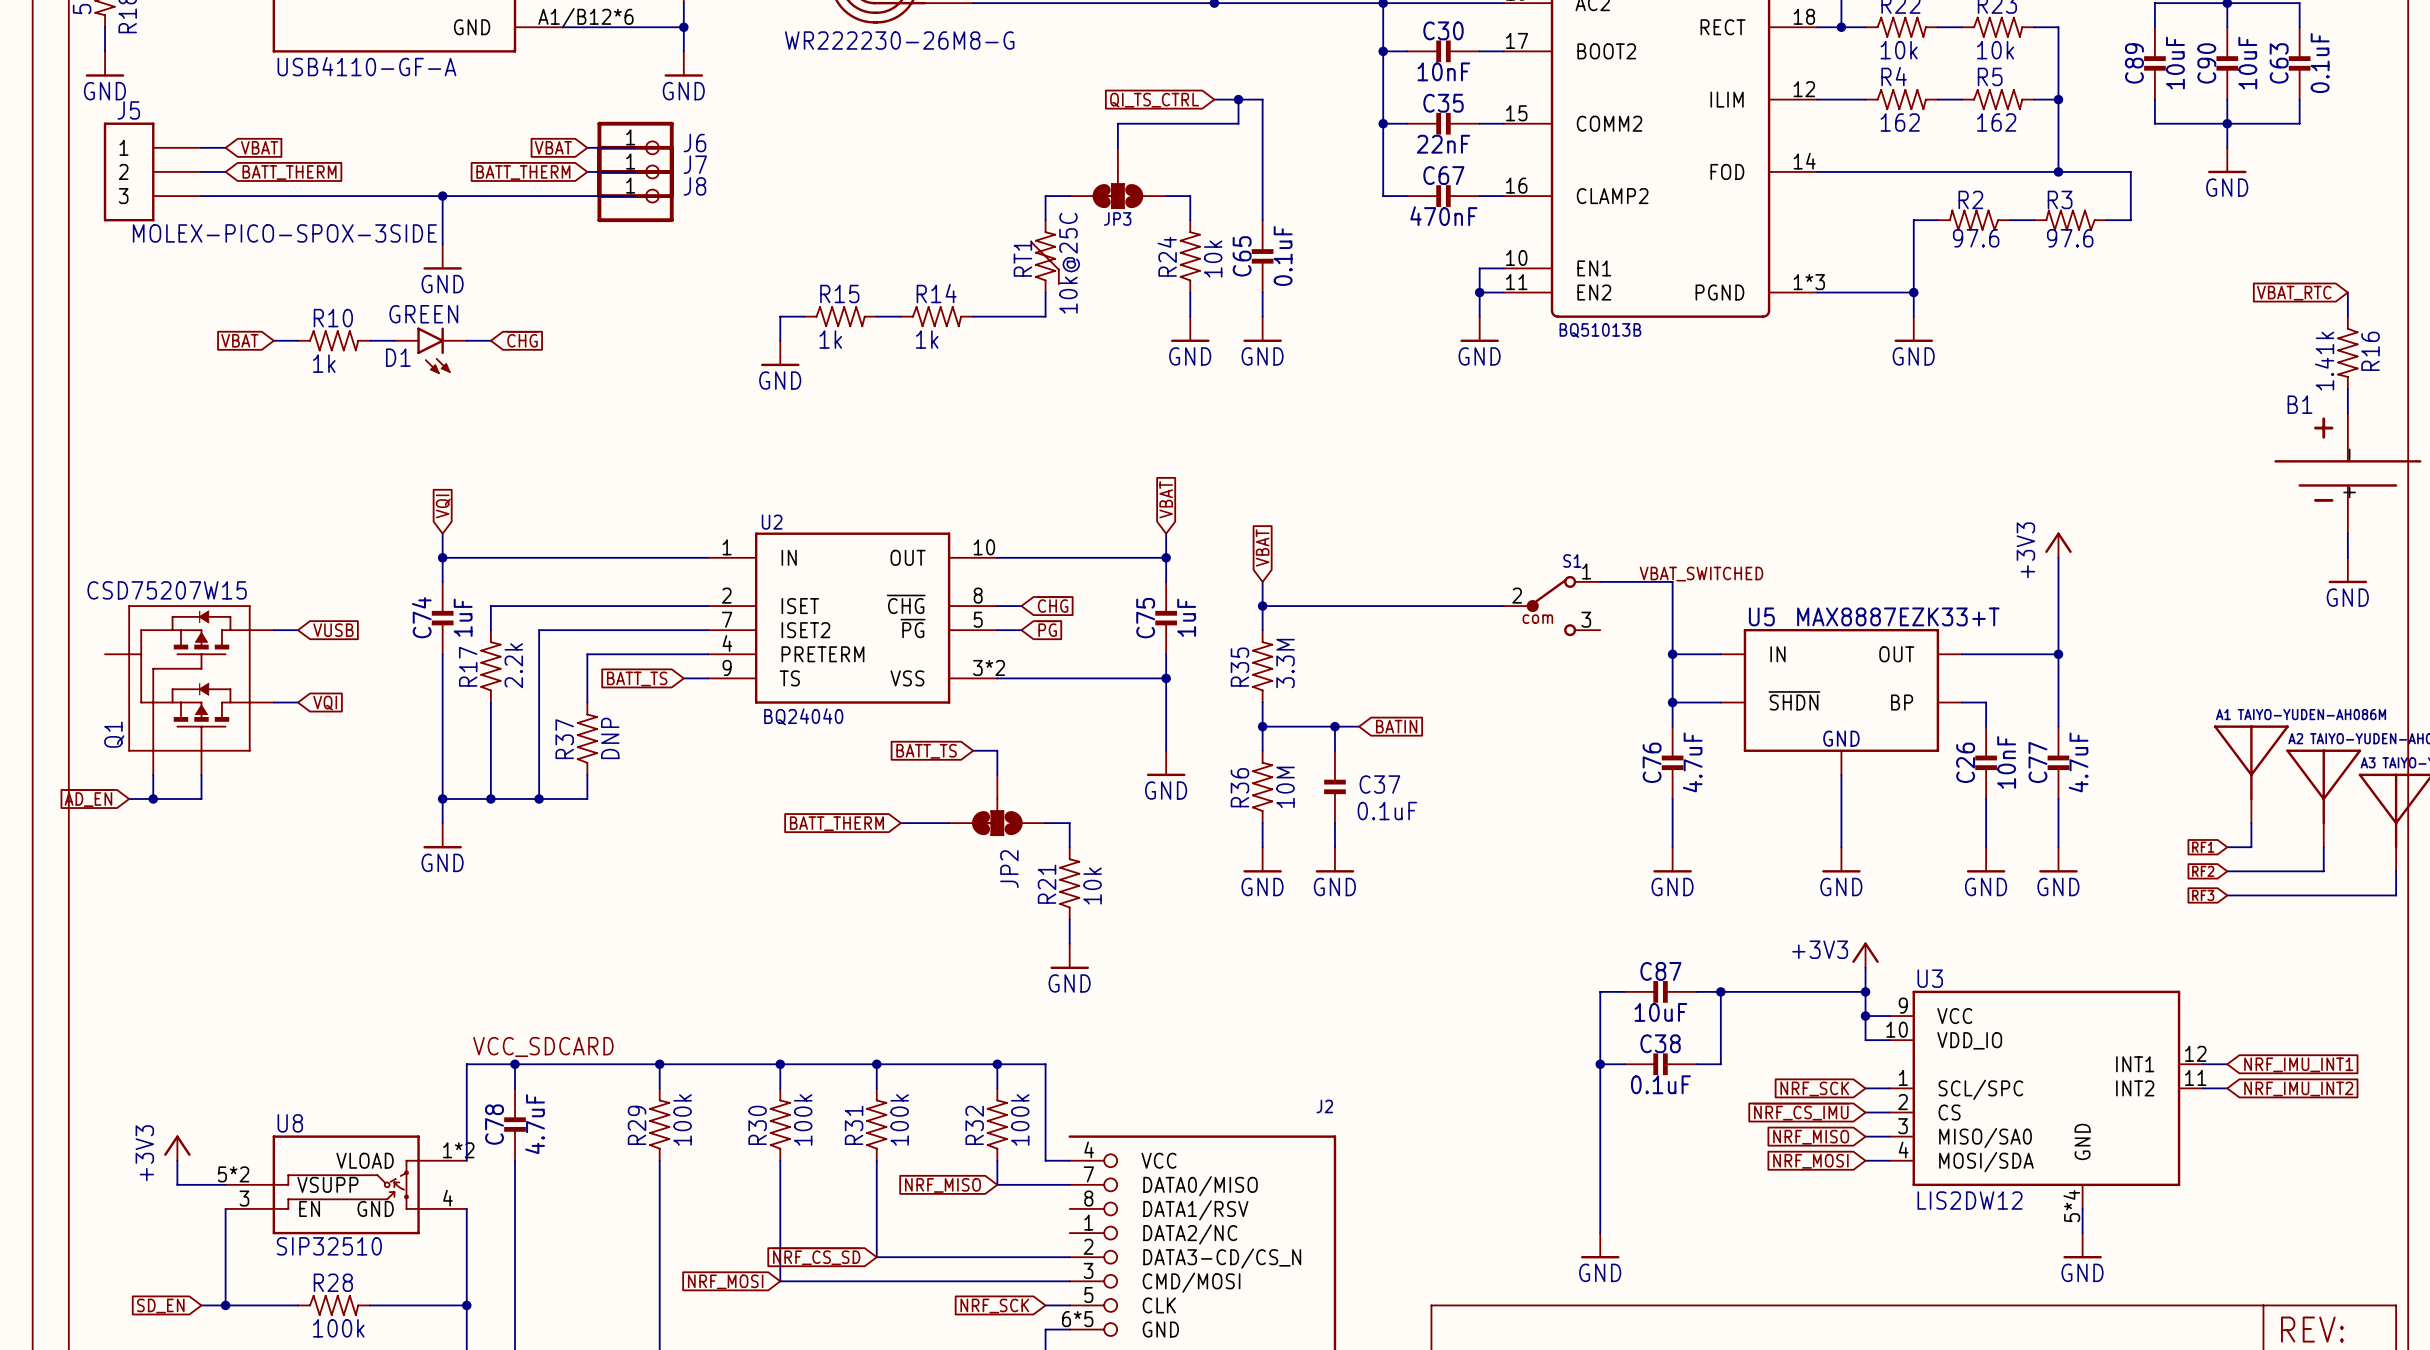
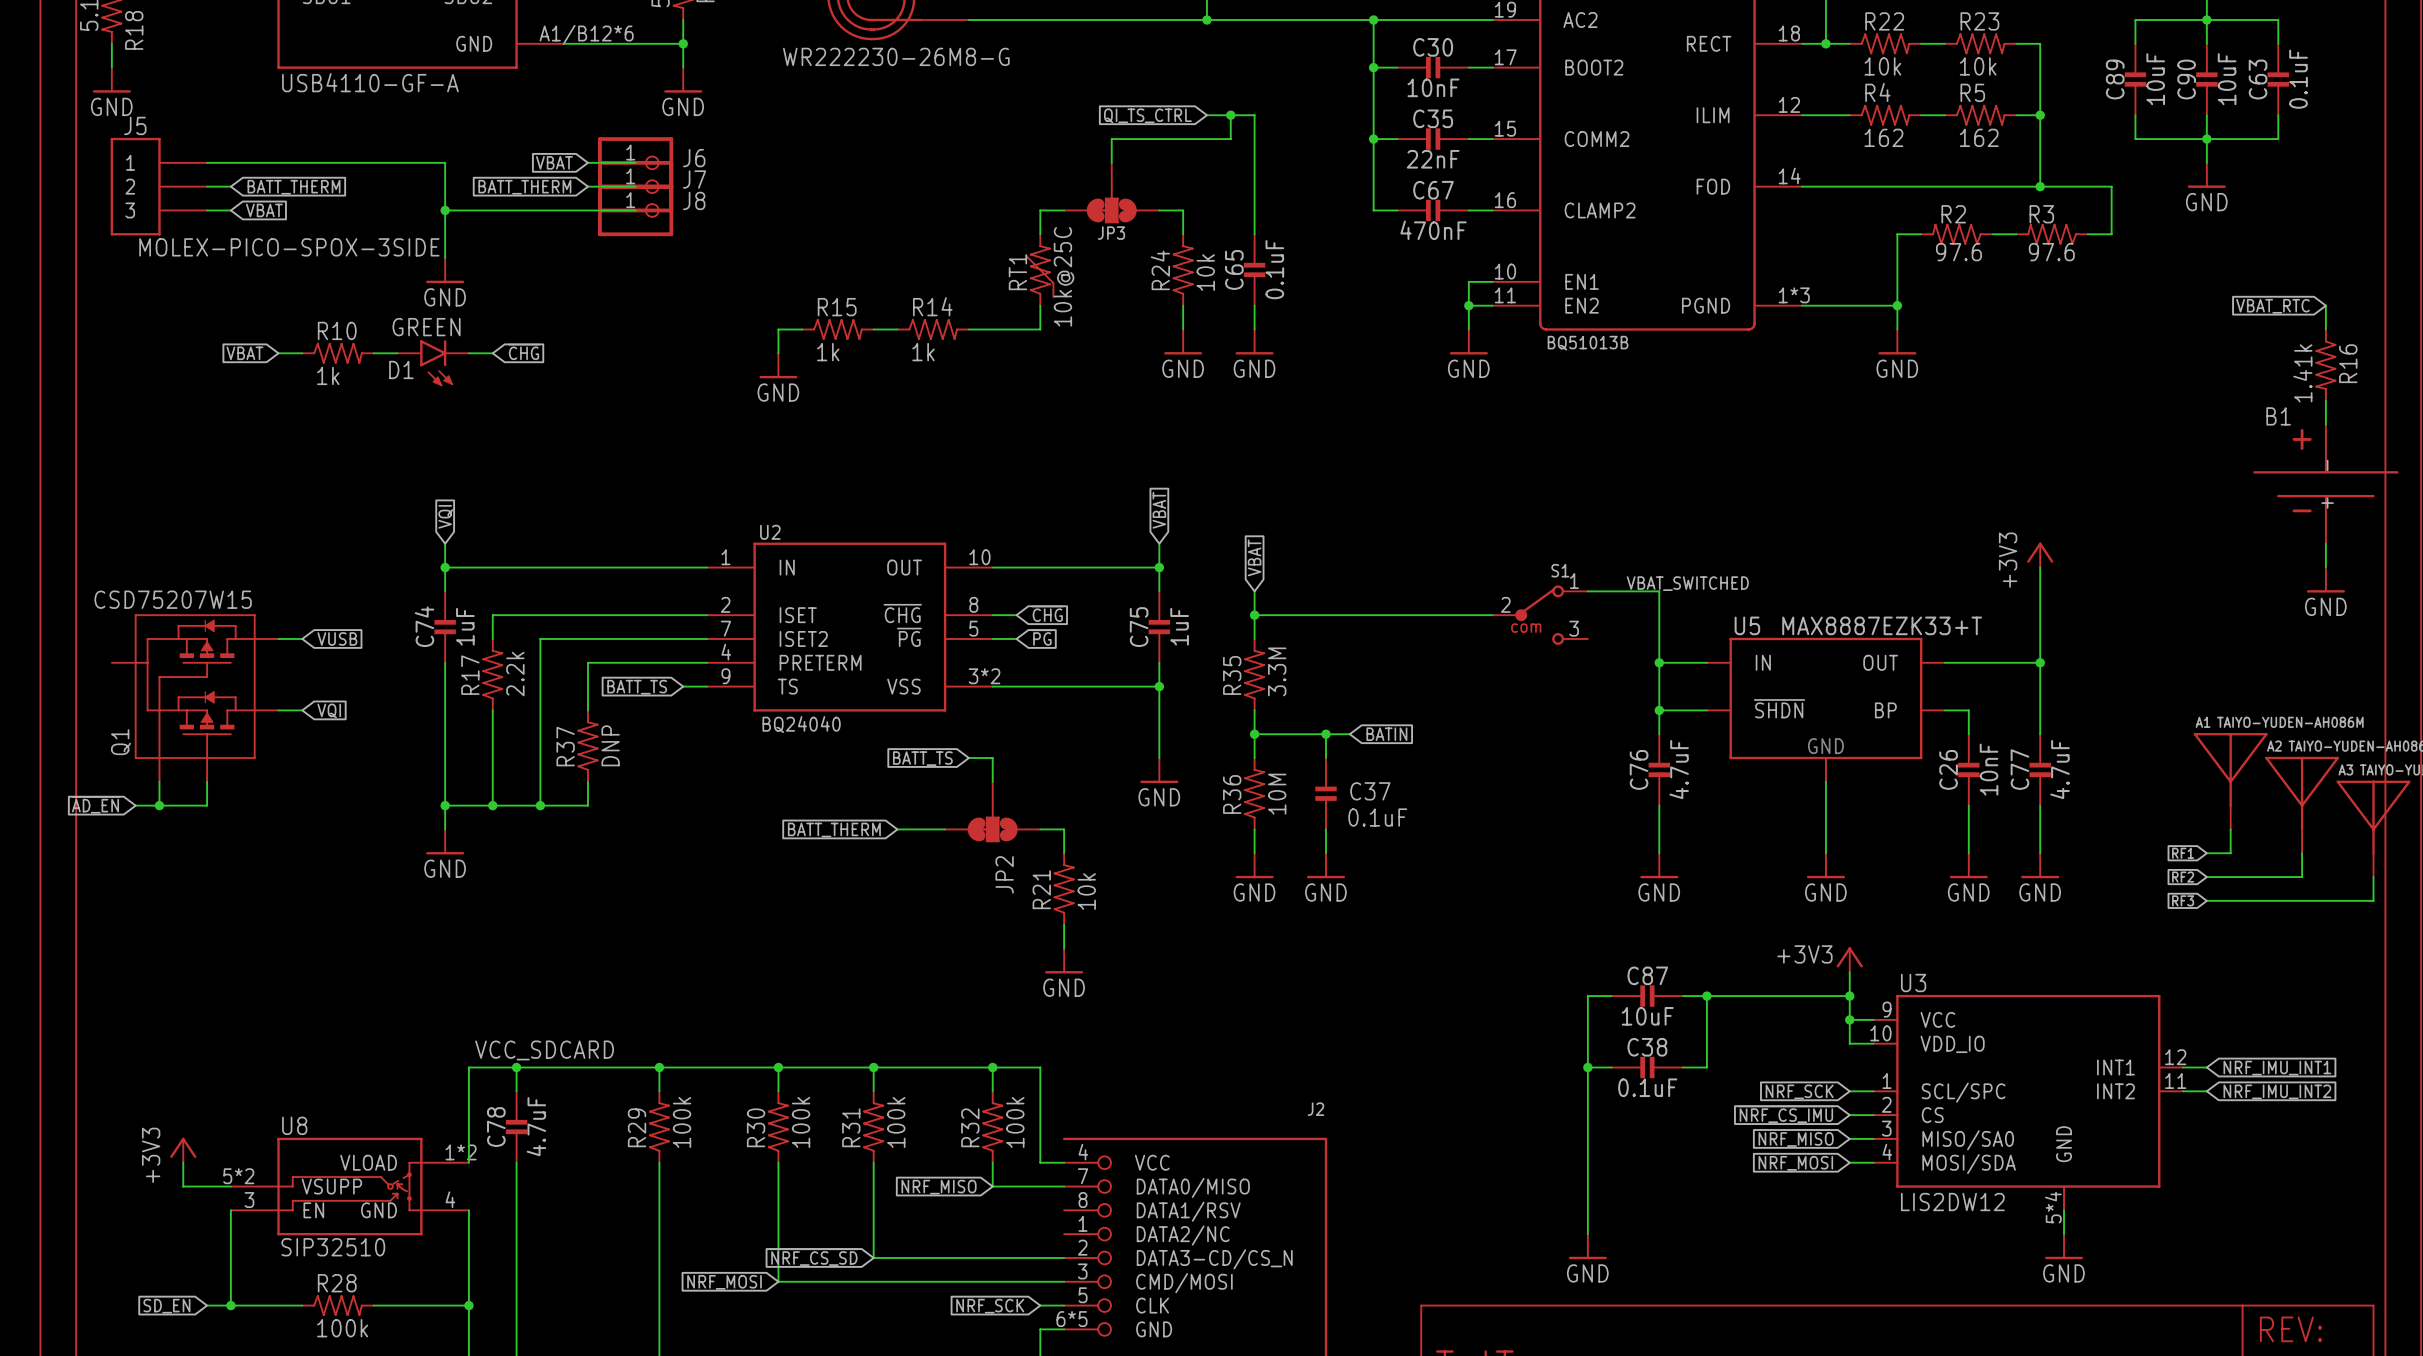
global label position: VBAT (259, 147) -> VBAT (264, 210)
wire: (225, 196) (442, 196) -> (230, 162) (445, 162) (445, 210)

